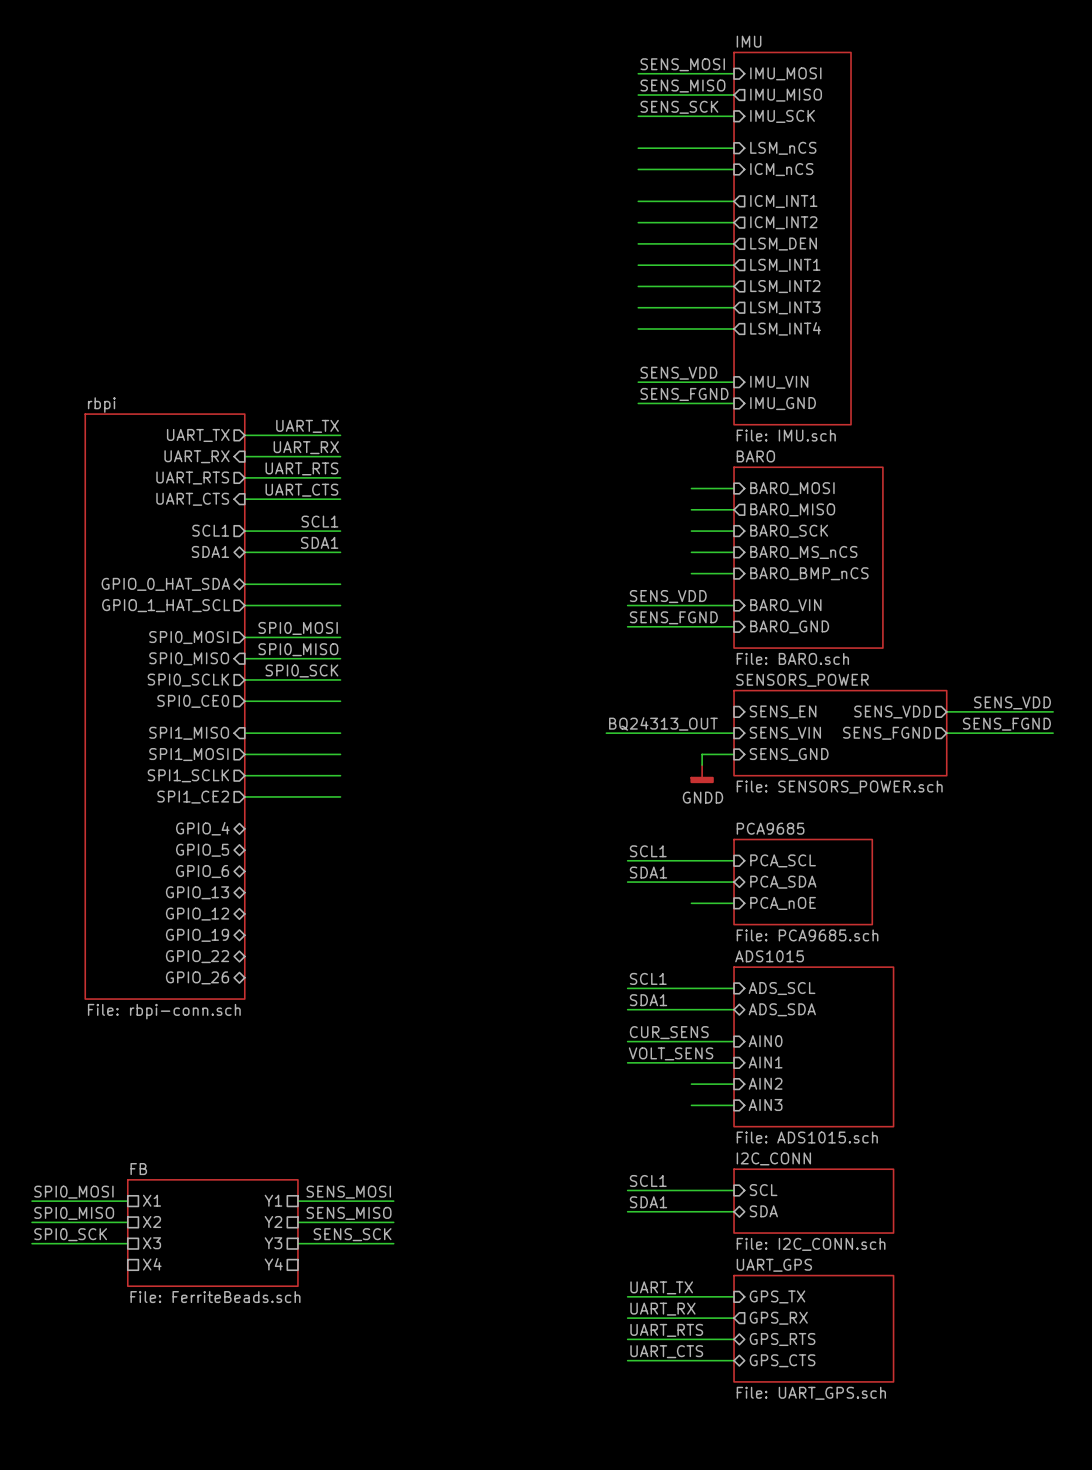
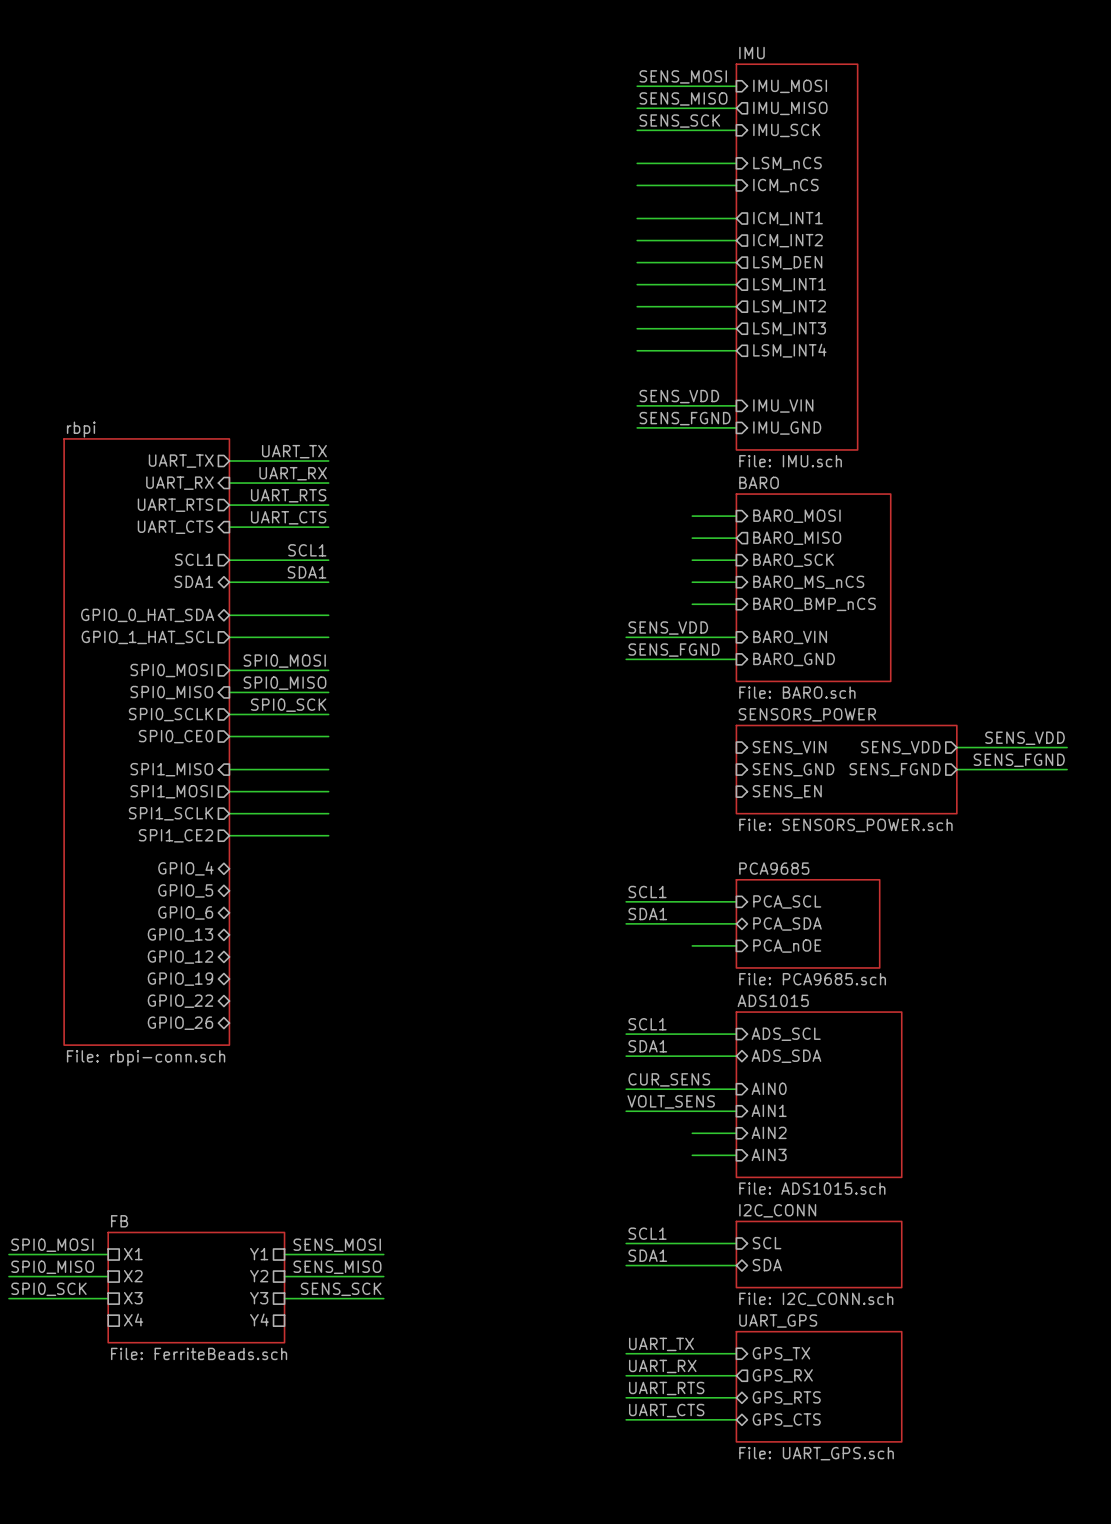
sheet pin: SENS_EN (783, 711) -> SENS_VIN (789, 747)
label: BQ24313_OUT (663, 723) -> none
wire: (606, 733) (734, 733) -> none
sheet pin: SENS_VIN (785, 733) -> SENS_GND (793, 769)
wire: (734, 754) (702, 754) (702, 765) -> none
sheet pin: SENS_GND (789, 754) -> SENS_EN (787, 791)
power symbol: GNDD (702, 774) -> none

